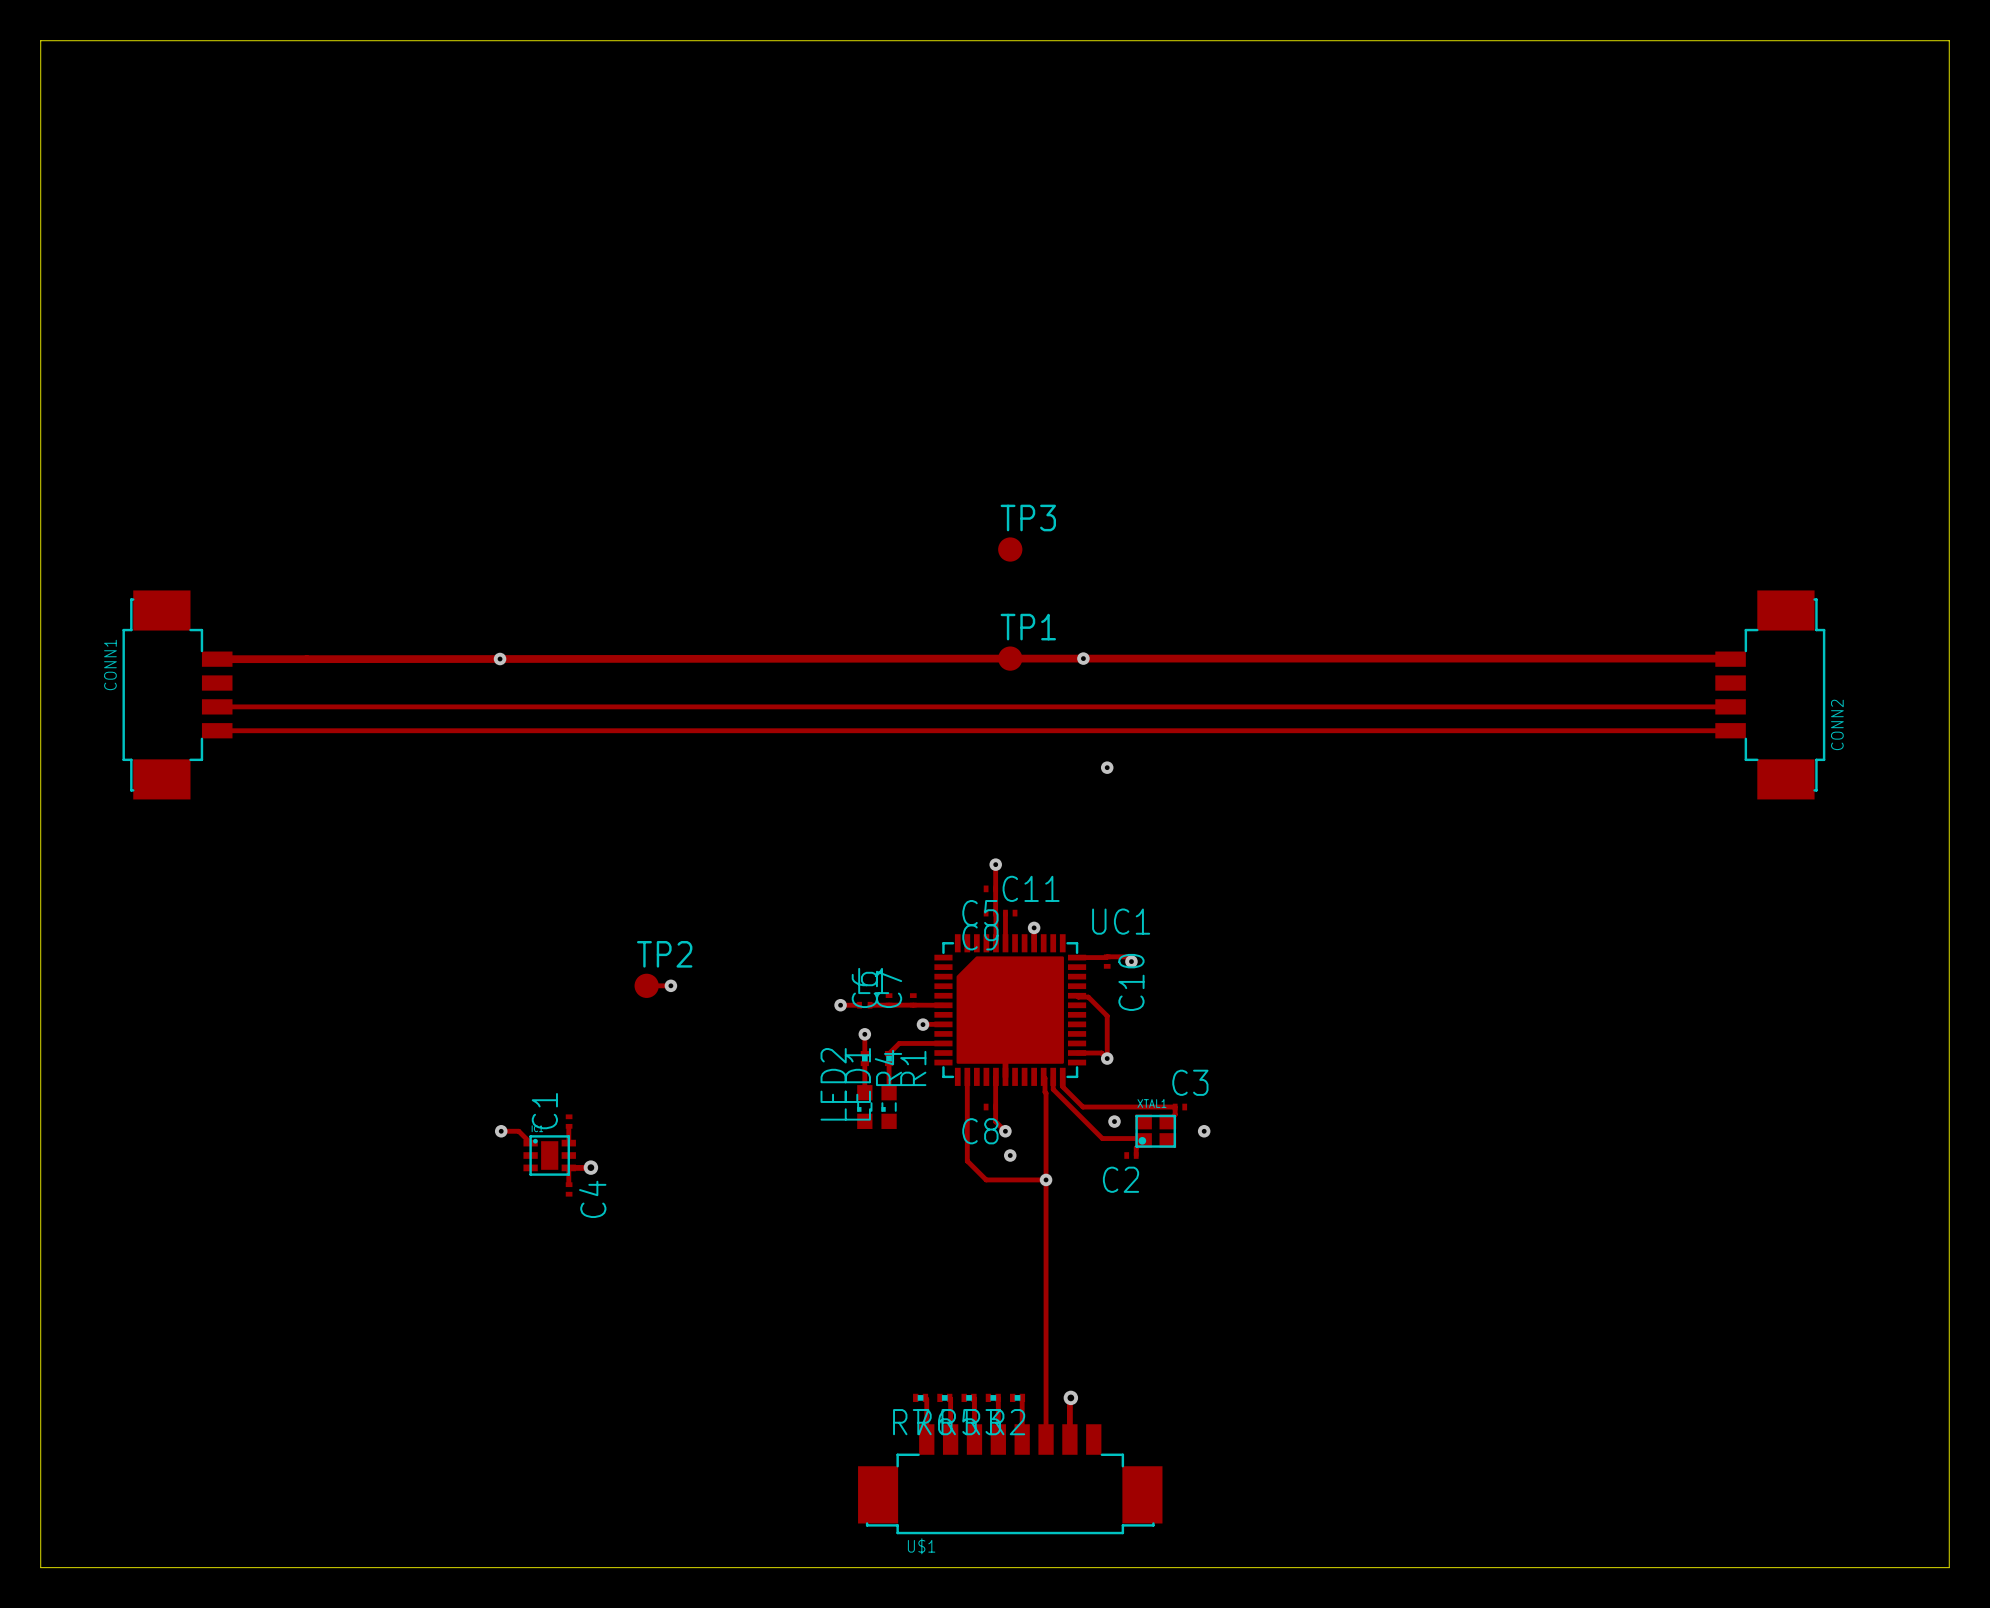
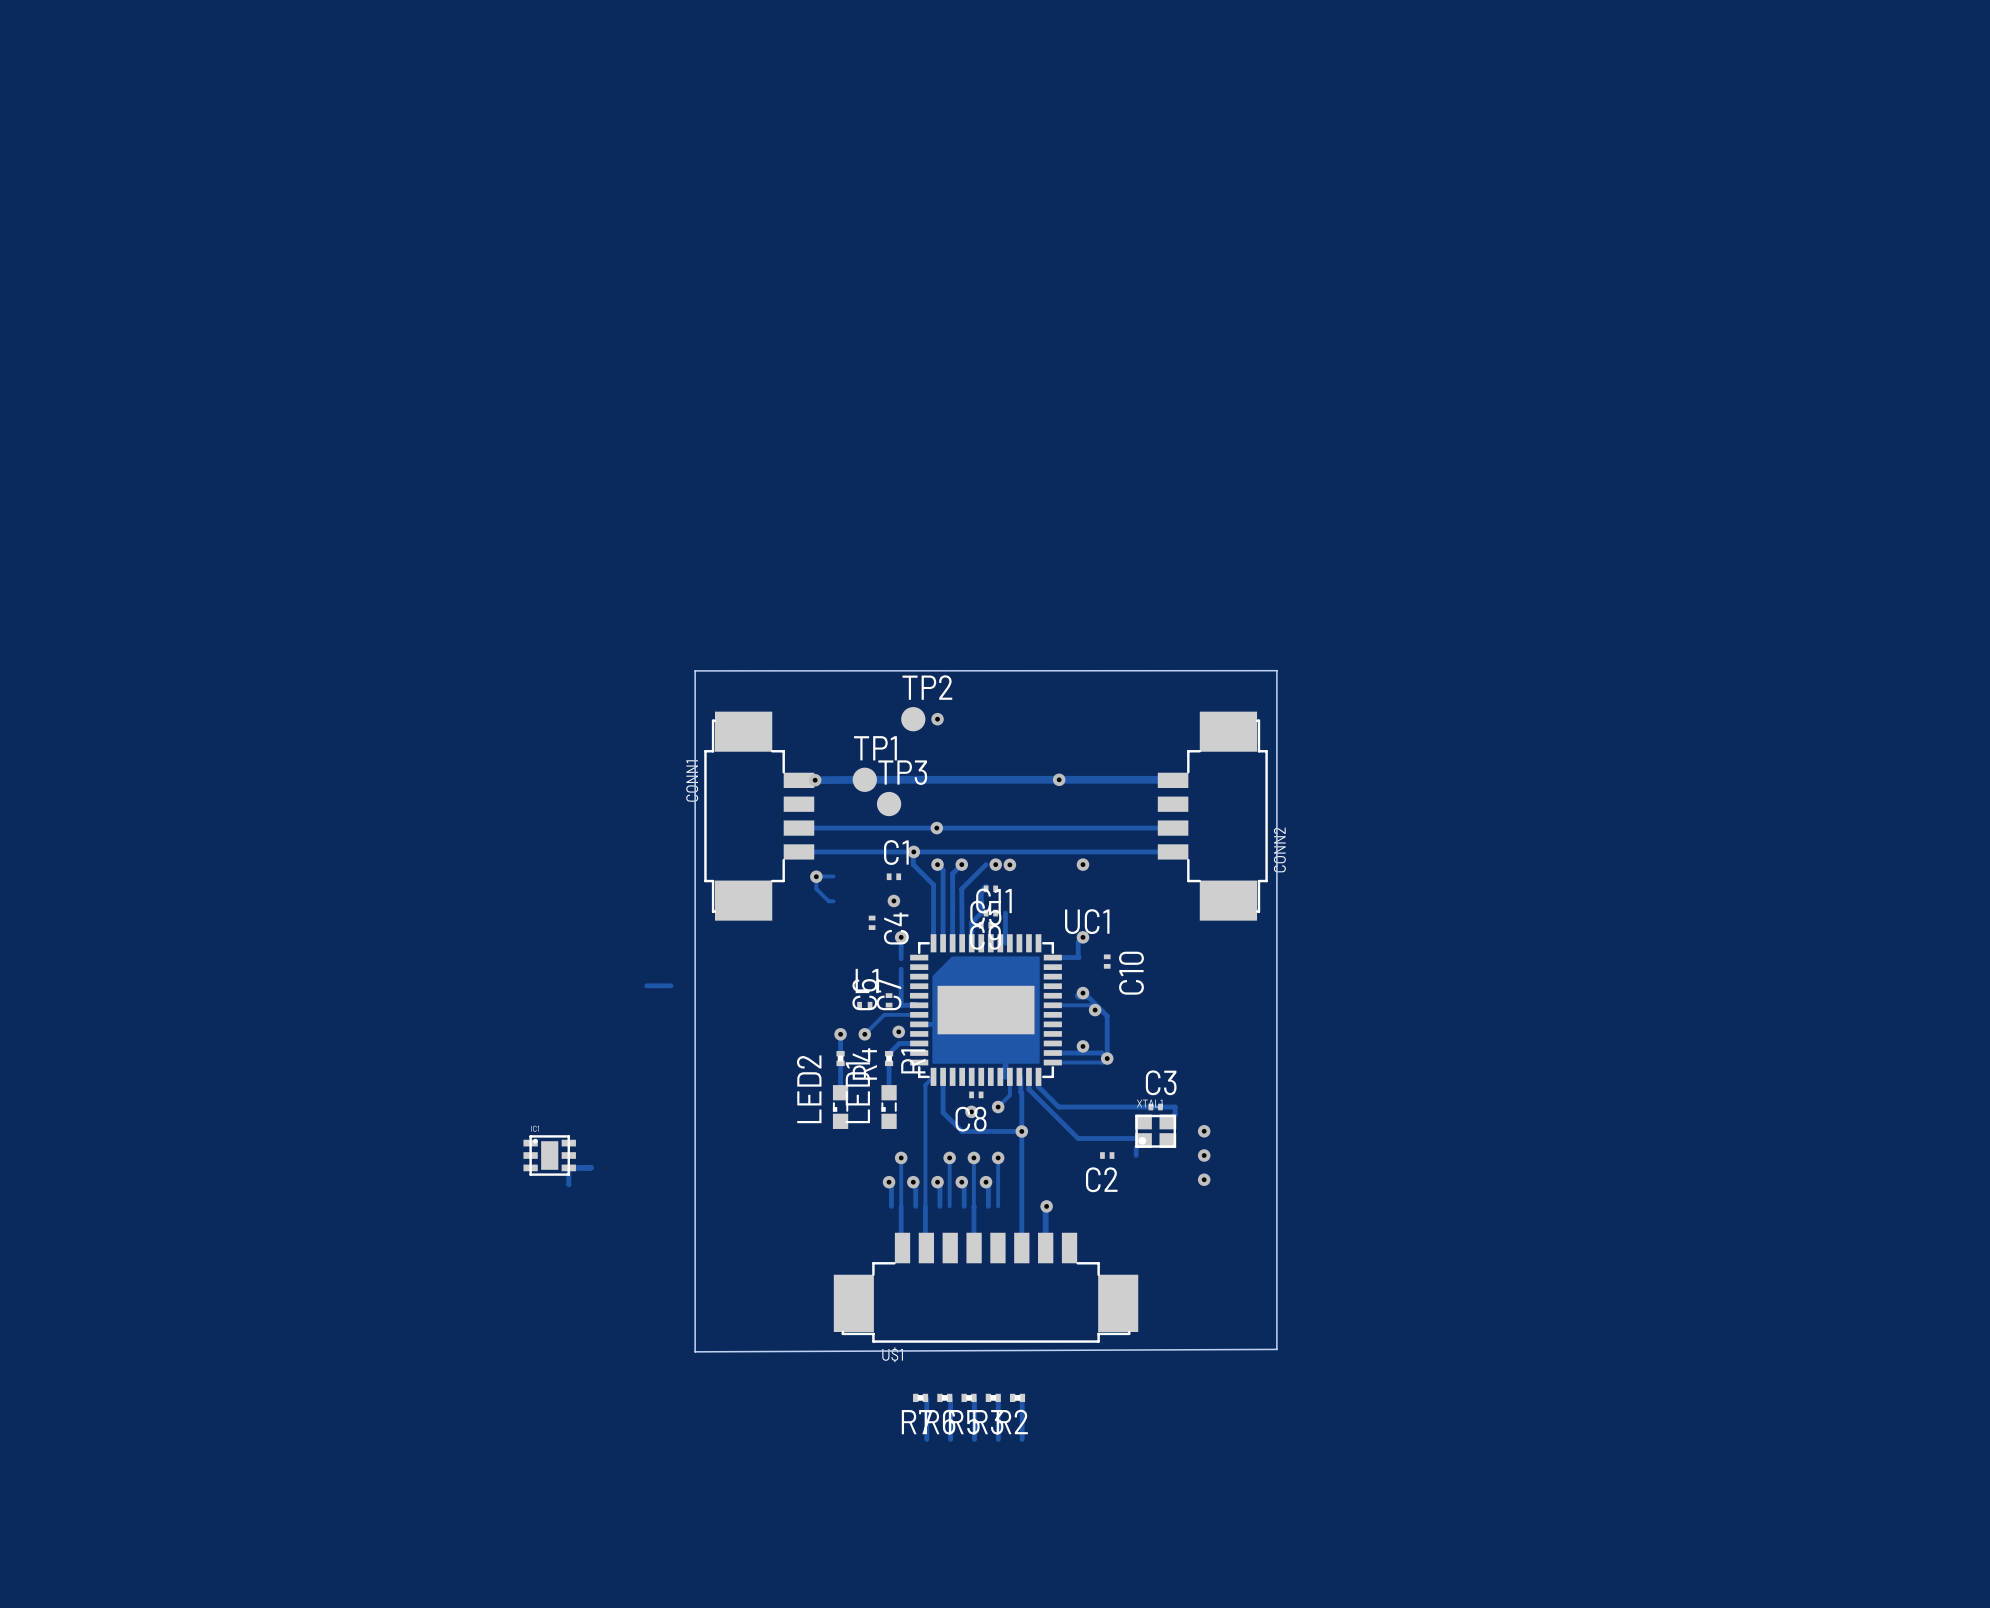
board edge: (40, 40) (1949, 40) (1949, 1567) (40, 1567) (40, 40) -> none
TP3 position: (1010, 549) -> (889, 804)
TP1 position: (1010, 658) -> (864, 779)
via: (1083, 658) -> none
track: (217, 659) (1730, 659) -> none
via: (500, 659) -> none
board edge: none -> (1276, 670) (1276, 1349) (695, 1351) (695, 670) (1276, 670)
CONN1 position: (177, 694) -> (759, 816)
CONN2 position: (1770, 694) -> (1212, 816)
track: (217, 706) (1730, 706) -> none
via: none -> (937, 719)
track: (217, 730) (1730, 730) -> none
via position: (1107, 767) -> (1059, 779)
track: none -> (798, 780) (1173, 780)
via: none -> (815, 780)
track: none -> (798, 828) (1173, 828)
via: none -> (936, 828)
track: none -> (798, 851) (1173, 851)
track: none -> (913, 851) (913, 864) (933, 884) (933, 943)
via: none -> (913, 851)
track: none -> (937, 864) (943, 870) (943, 943)
via: none -> (937, 864)
track: none -> (961, 864) (952, 873) (952, 943)
via: none -> (961, 864)
track: none -> (986, 864) (961, 888) (962, 943)
track: (995, 864) (995, 943) -> none
via: none -> (1009, 864)
via: none -> (1082, 864)
via: none -> (816, 876)
track: none -> (833, 876) (816, 876) (816, 888) (828, 901) (833, 901)
track: none -> (986, 886) (981, 891) (981, 913) (971, 922) (971, 943)
via: none -> (893, 900)
C11 position: (1010, 913) -> (986, 925)
via: (1034, 927) -> none
track: none -> (901, 937) (901, 958)
via: none -> (901, 937)
track: none -> (1082, 937) (1078, 942) (1078, 957) (1052, 957)
via: none -> (1082, 937)
track: (1077, 957) (1126, 956) (1131, 961) -> none
via: (1131, 961) -> none
track: none -> (901, 969) (901, 1005) (919, 1005)
TP2 position: (646, 985) -> (913, 719)
via: (670, 985) -> none
via: none -> (1082, 993)
track: (840, 1005) (859, 1005) -> none
via position: (840, 1005) -> (840, 1034)
track: (870, 1005) (943, 1005) -> none
track: none -> (1052, 1005) (1090, 1005) (1095, 1010)
UC1 position: (1010, 1010) -> (986, 1010)
via: none -> (1095, 1010)
via position: (922, 1024) -> (898, 1031)
track: none -> (840, 1034) (840, 1053)
track: (864, 1034) (864, 1053) -> (864, 1034) (884, 1014) (919, 1014)
track: (919, 1043) (943, 1043) -> (1052, 1053) (1077, 1053)
via: none -> (1082, 1046)
R4 position: (864, 1058) -> (840, 1058)
track: none -> (1107, 1058) (1103, 1062) (1052, 1062)
track: (864, 1063) (864, 1092) -> (840, 1063) (840, 1092)
track: none -> (933, 1076) (925, 1084) (926, 1248)
track: none -> (943, 1076) (943, 1112) (961, 1131) (1021, 1131)
track: (967, 1076) (967, 1161) (986, 1179) (1046, 1179) -> none
track: (995, 1076) (995, 1121) (1005, 1131) -> none
track: none -> (1009, 1076) (1009, 1095) (998, 1107)
track: none -> (1019, 1076) (1021, 1093) (1021, 1248)
track: (1043, 1076) (1046, 1093) (1046, 1439) -> none
track: (1053, 1076) (1053, 1089) (1102, 1138) -> (1028, 1076) (1028, 1089) (1078, 1138) (1102, 1138)
track: (1062, 1076) (1062, 1086) (1082, 1107) -> (1038, 1076) (1038, 1086) (1058, 1107) (1082, 1107)
LED2 position: (864, 1107) -> (840, 1107)
C8 position: (990, 1107) -> (976, 1094)
via: none -> (998, 1107)
C3 position: (1179, 1107) -> (1155, 1107)
via: none -> (971, 1111)
C1 rotation: 0° (569, 1121) -> 90° clockwise (893, 876)
C1 position: (569, 1121) -> (893, 876)
via: (1114, 1121) -> none
track: (569, 1126) (568, 1143) -> none
track: (501, 1131) (518, 1131) (530, 1143) -> none
via: (501, 1131) -> none
via: (1005, 1131) -> none
via: none -> (1021, 1131)
via position: (1010, 1155) -> (998, 1157)
C2 position: (1131, 1155) -> (1107, 1155)
via: none -> (1204, 1155)
track: none -> (901, 1157) (902, 1248)
via: none -> (901, 1157)
track: none -> (949, 1157) (949, 1206)
via: none -> (949, 1157)
track: none -> (973, 1157) (973, 1247)
via: none -> (973, 1157)
track: none -> (998, 1157) (998, 1206)
via: (590, 1167) -> none
via: (1046, 1179) -> none
via: none -> (1204, 1179)
track: none -> (889, 1182) (891, 1184) (891, 1206)
via: none -> (889, 1182)
track: none -> (913, 1182) (915, 1184) (915, 1206)
via: none -> (913, 1182)
track: none -> (937, 1182) (939, 1184) (939, 1206)
via: none -> (937, 1182)
track: none -> (961, 1182) (964, 1184) (964, 1206)
via: none -> (961, 1182)
track: none -> (986, 1182) (988, 1184) (988, 1206)
via: none -> (986, 1182)
C4 position: (569, 1189) -> (872, 922)
via: none -> (1046, 1206)
track: (1070, 1397) (1069, 1439) -> (1046, 1206) (1045, 1248)
via: (1070, 1397) -> none
U$1 position: (1010, 1479) -> (986, 1287)

